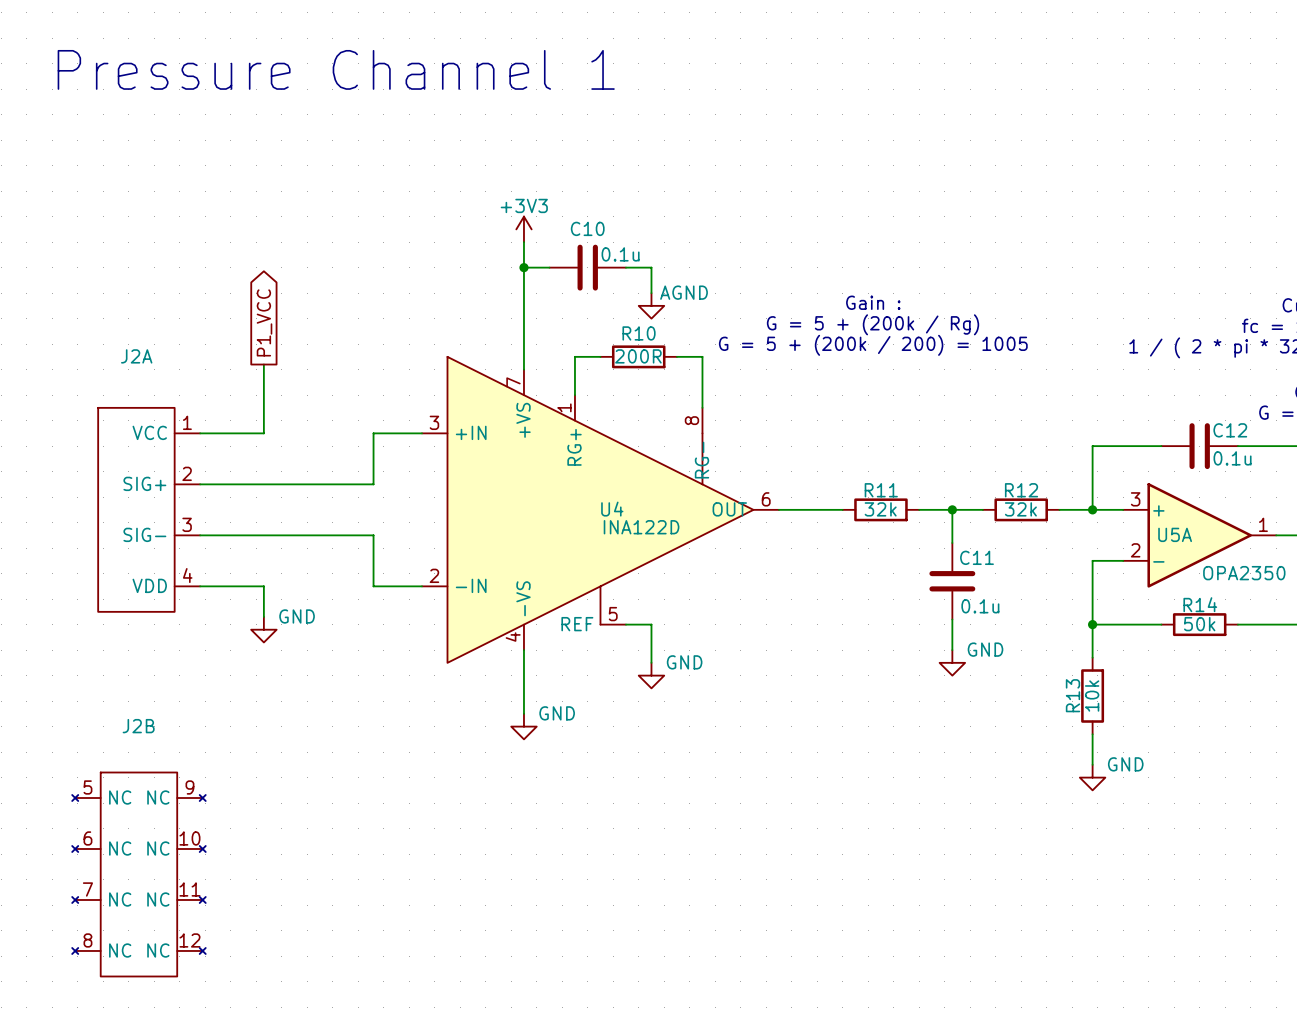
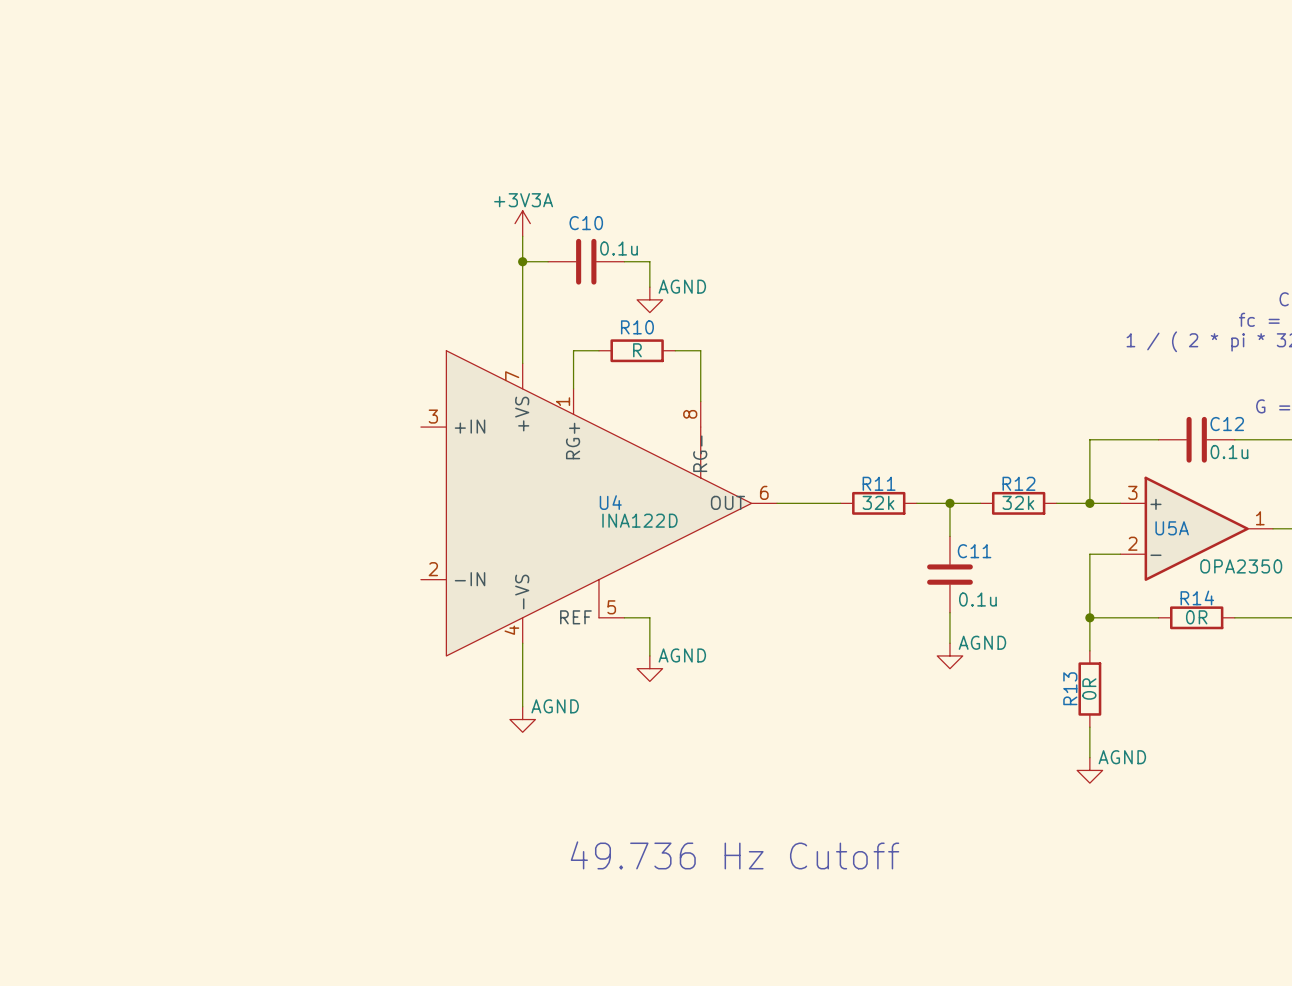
text: Pressure Channel 1 (336, 69) -> none
power symbol: +3V3 (523, 229) -> +3V3A (522, 223)
text: Gain : (873, 302) -> none
global label: P1_VCC (264, 322) -> none
text: G = 5 + (200k / Rg) (873, 324) -> none
text: G = 5 + (200k / 200) = 1005 (873, 345) -> none
R10 value: 200R (638, 356) -> R (637, 350)
wire: (263, 364) (263, 433) (200, 433) -> none
wire: (421, 433) (373, 433) (373, 484) (200, 484) -> none
J2A: (149, 509) -> none
wire: (200, 535) (373, 535) (373, 586) (421, 586) -> none
wire: (200, 586) (263, 586) (263, 616) -> none
R14 value: 50k (1199, 624) -> 0R (1196, 617)
power symbol: GND (263, 629) -> none
power symbol: GND (952, 662) -> AGND (949, 655)
power symbol: GND (651, 675) -> AGND (649, 668)
R13 value: 10k (1092, 696) -> 0R (1089, 689)
power symbol: GND (523, 726) -> AGND (522, 719)
power symbol: GND (1092, 777) -> AGND (1089, 770)
text: none -> 49.736 Hz Cutoff (735, 855)
J2B: (138, 874) -> none

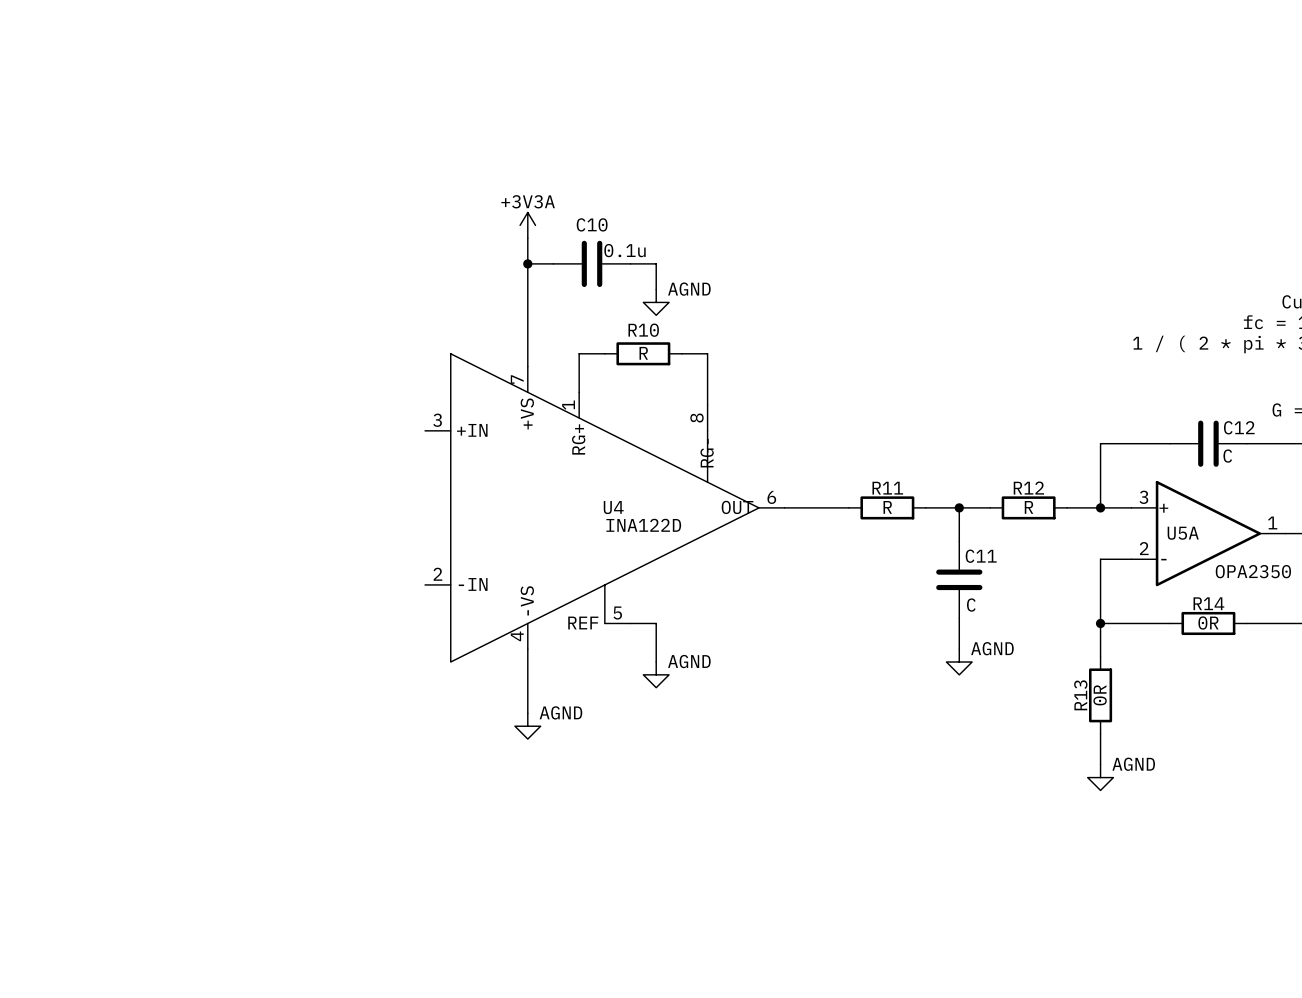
C12 value: 0.1u (1229, 452) -> C (1227, 456)
R11 value: 32k (878, 502) -> R (887, 507)
R12 value: 32k (1018, 502) -> R (1029, 507)
C11 value: 0.1u (977, 599) -> C (971, 605)
text: 49.736 Hz Cutoff (735, 855) -> none

